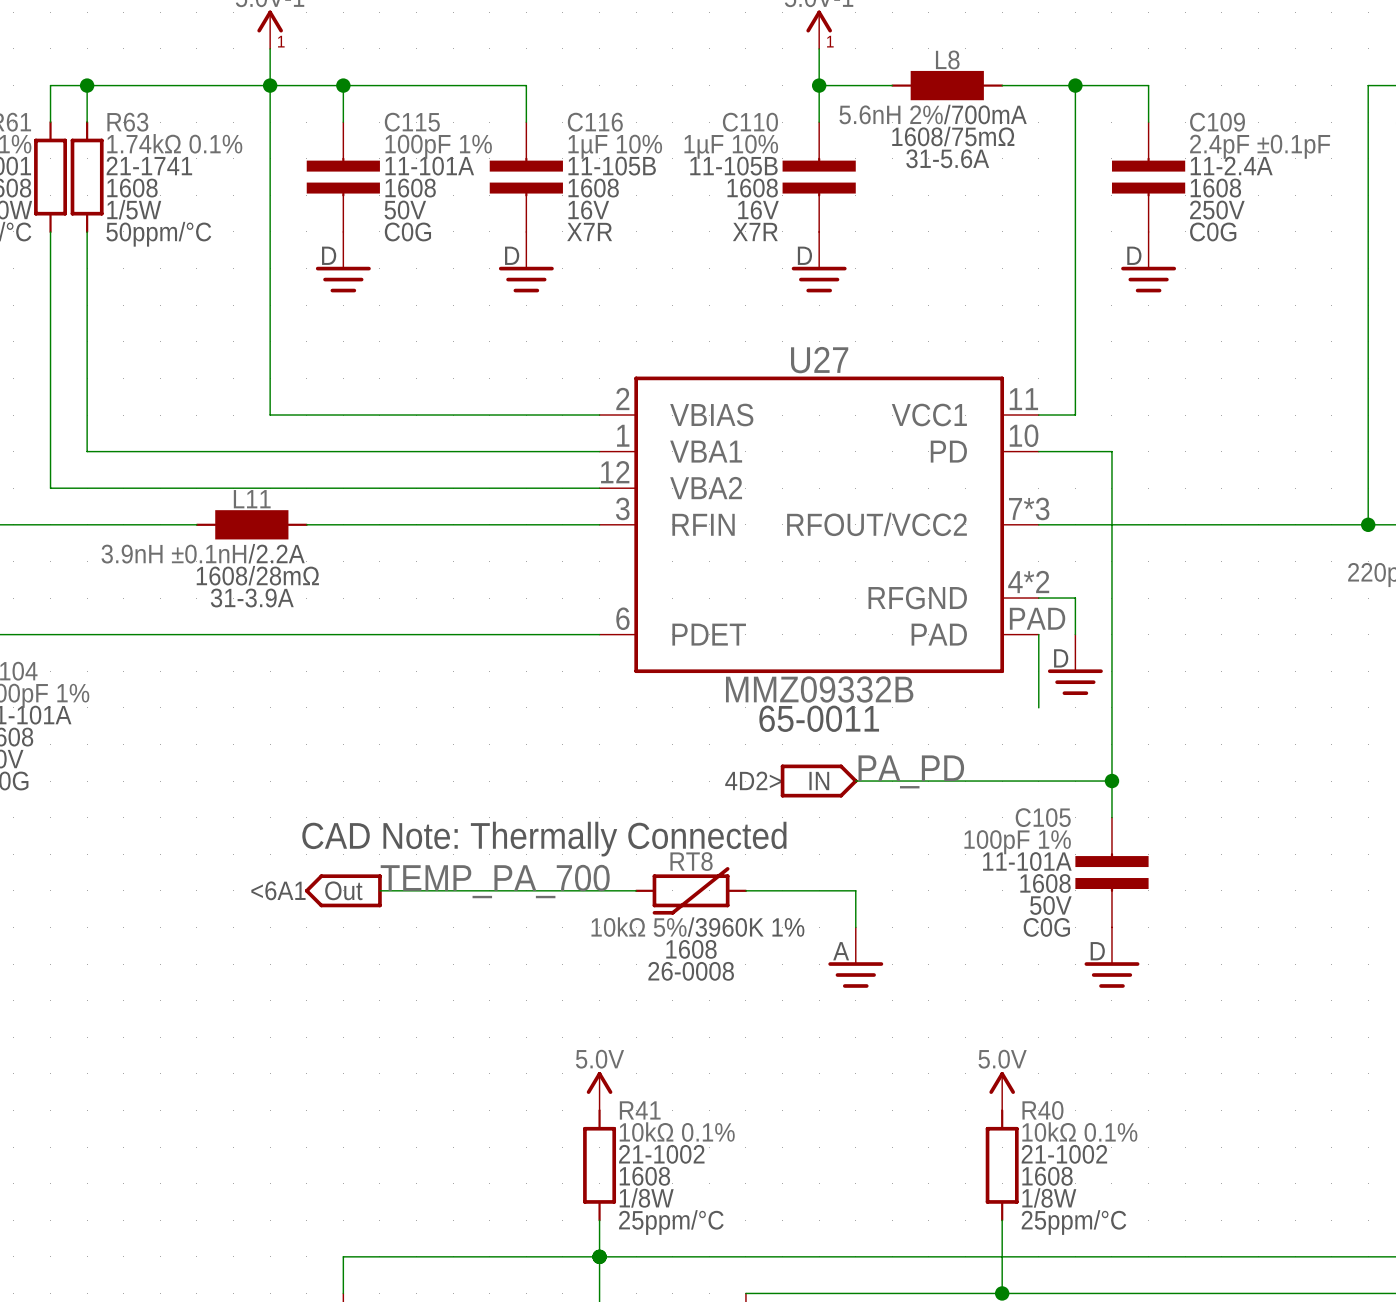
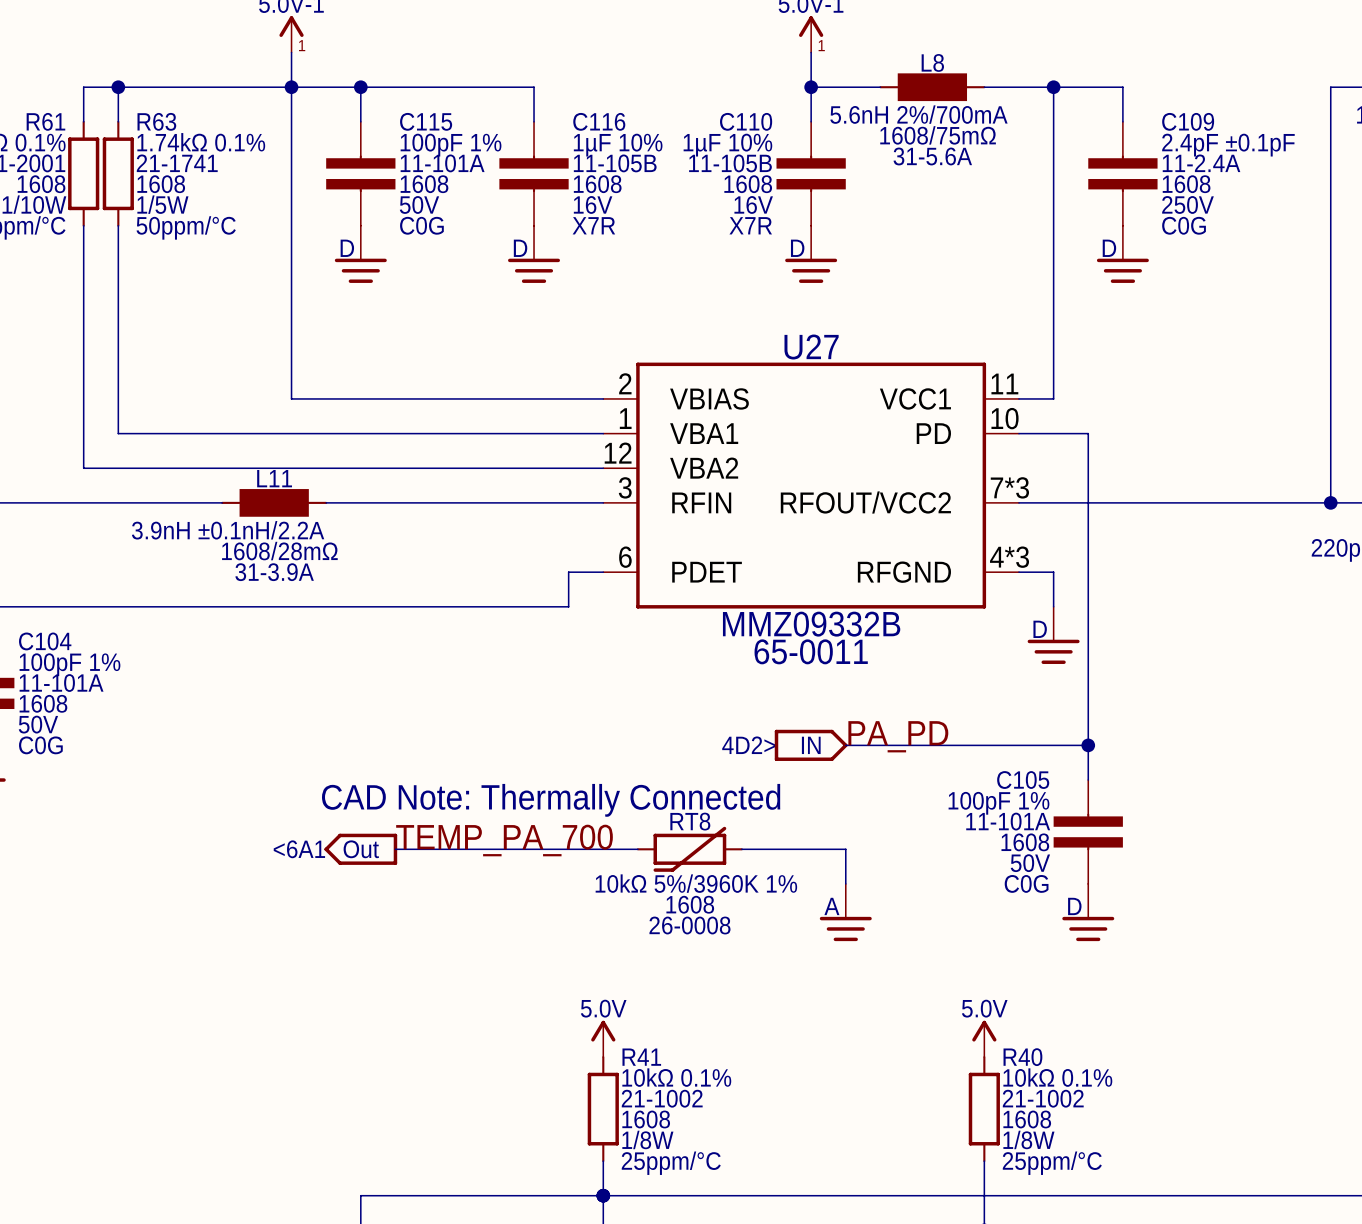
U27 symbol: [599, 376, 1039, 674] -> [603, 362, 1019, 609]
wire: (562, 634) (599, 634) -> (568, 606) (568, 572) (603, 572)
wire: (1038, 634) (1038, 707) -> none

